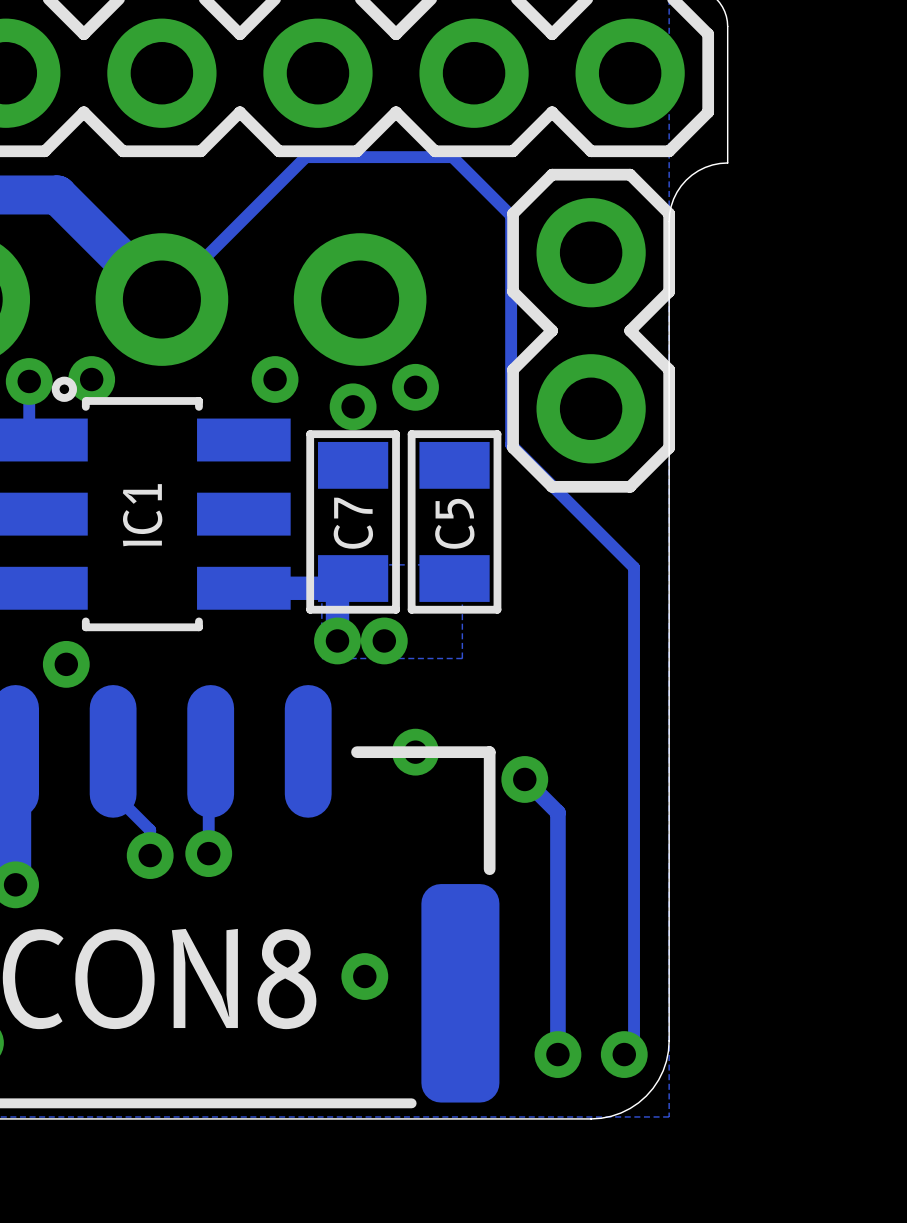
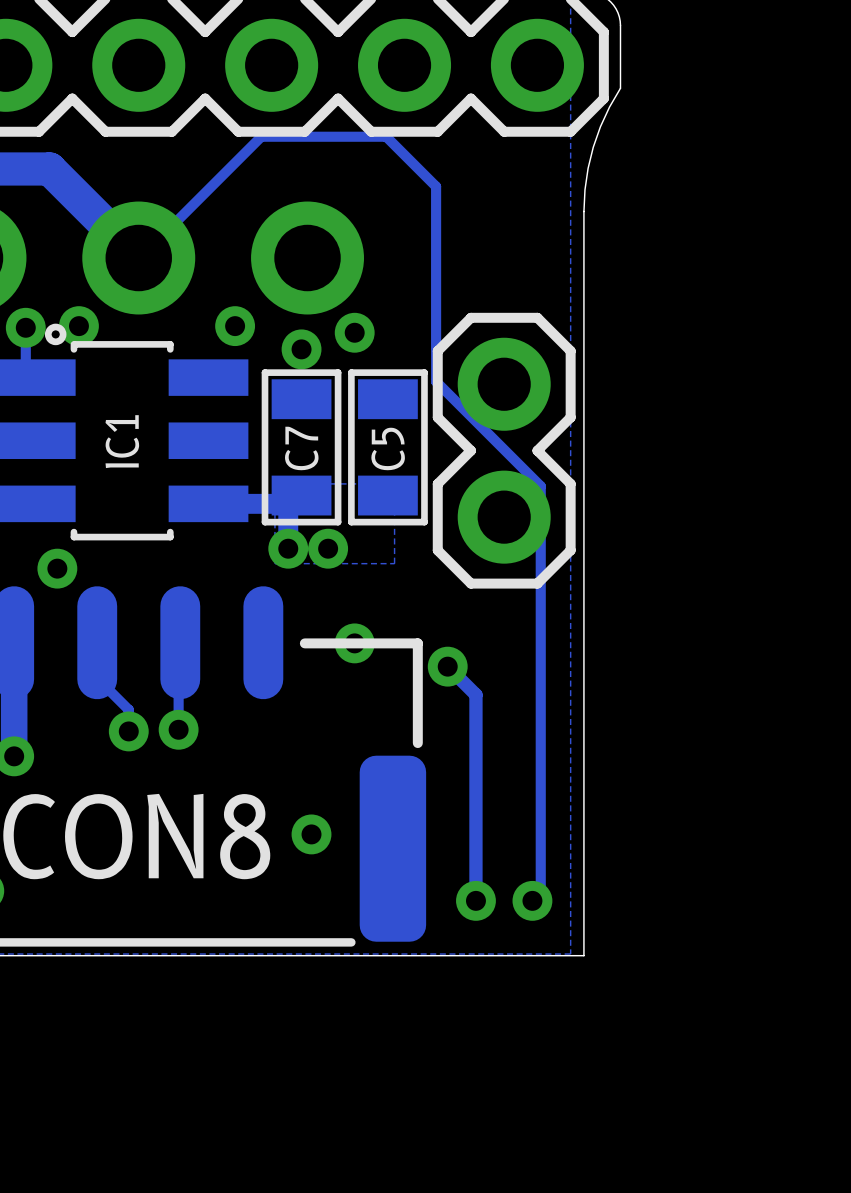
board edge: (727, 100) (727, 162) (705, 167) (686, 180) (673, 199) (669, 221) (668, 1051) (658, 1079) (638, 1102) (620, 1113) (591, 1118) -> (620, 88) (609, 107) (593, 147) (588, 168) (583, 211) (583, 955) (504, 955)
part position: (591, 330) -> (504, 450)

